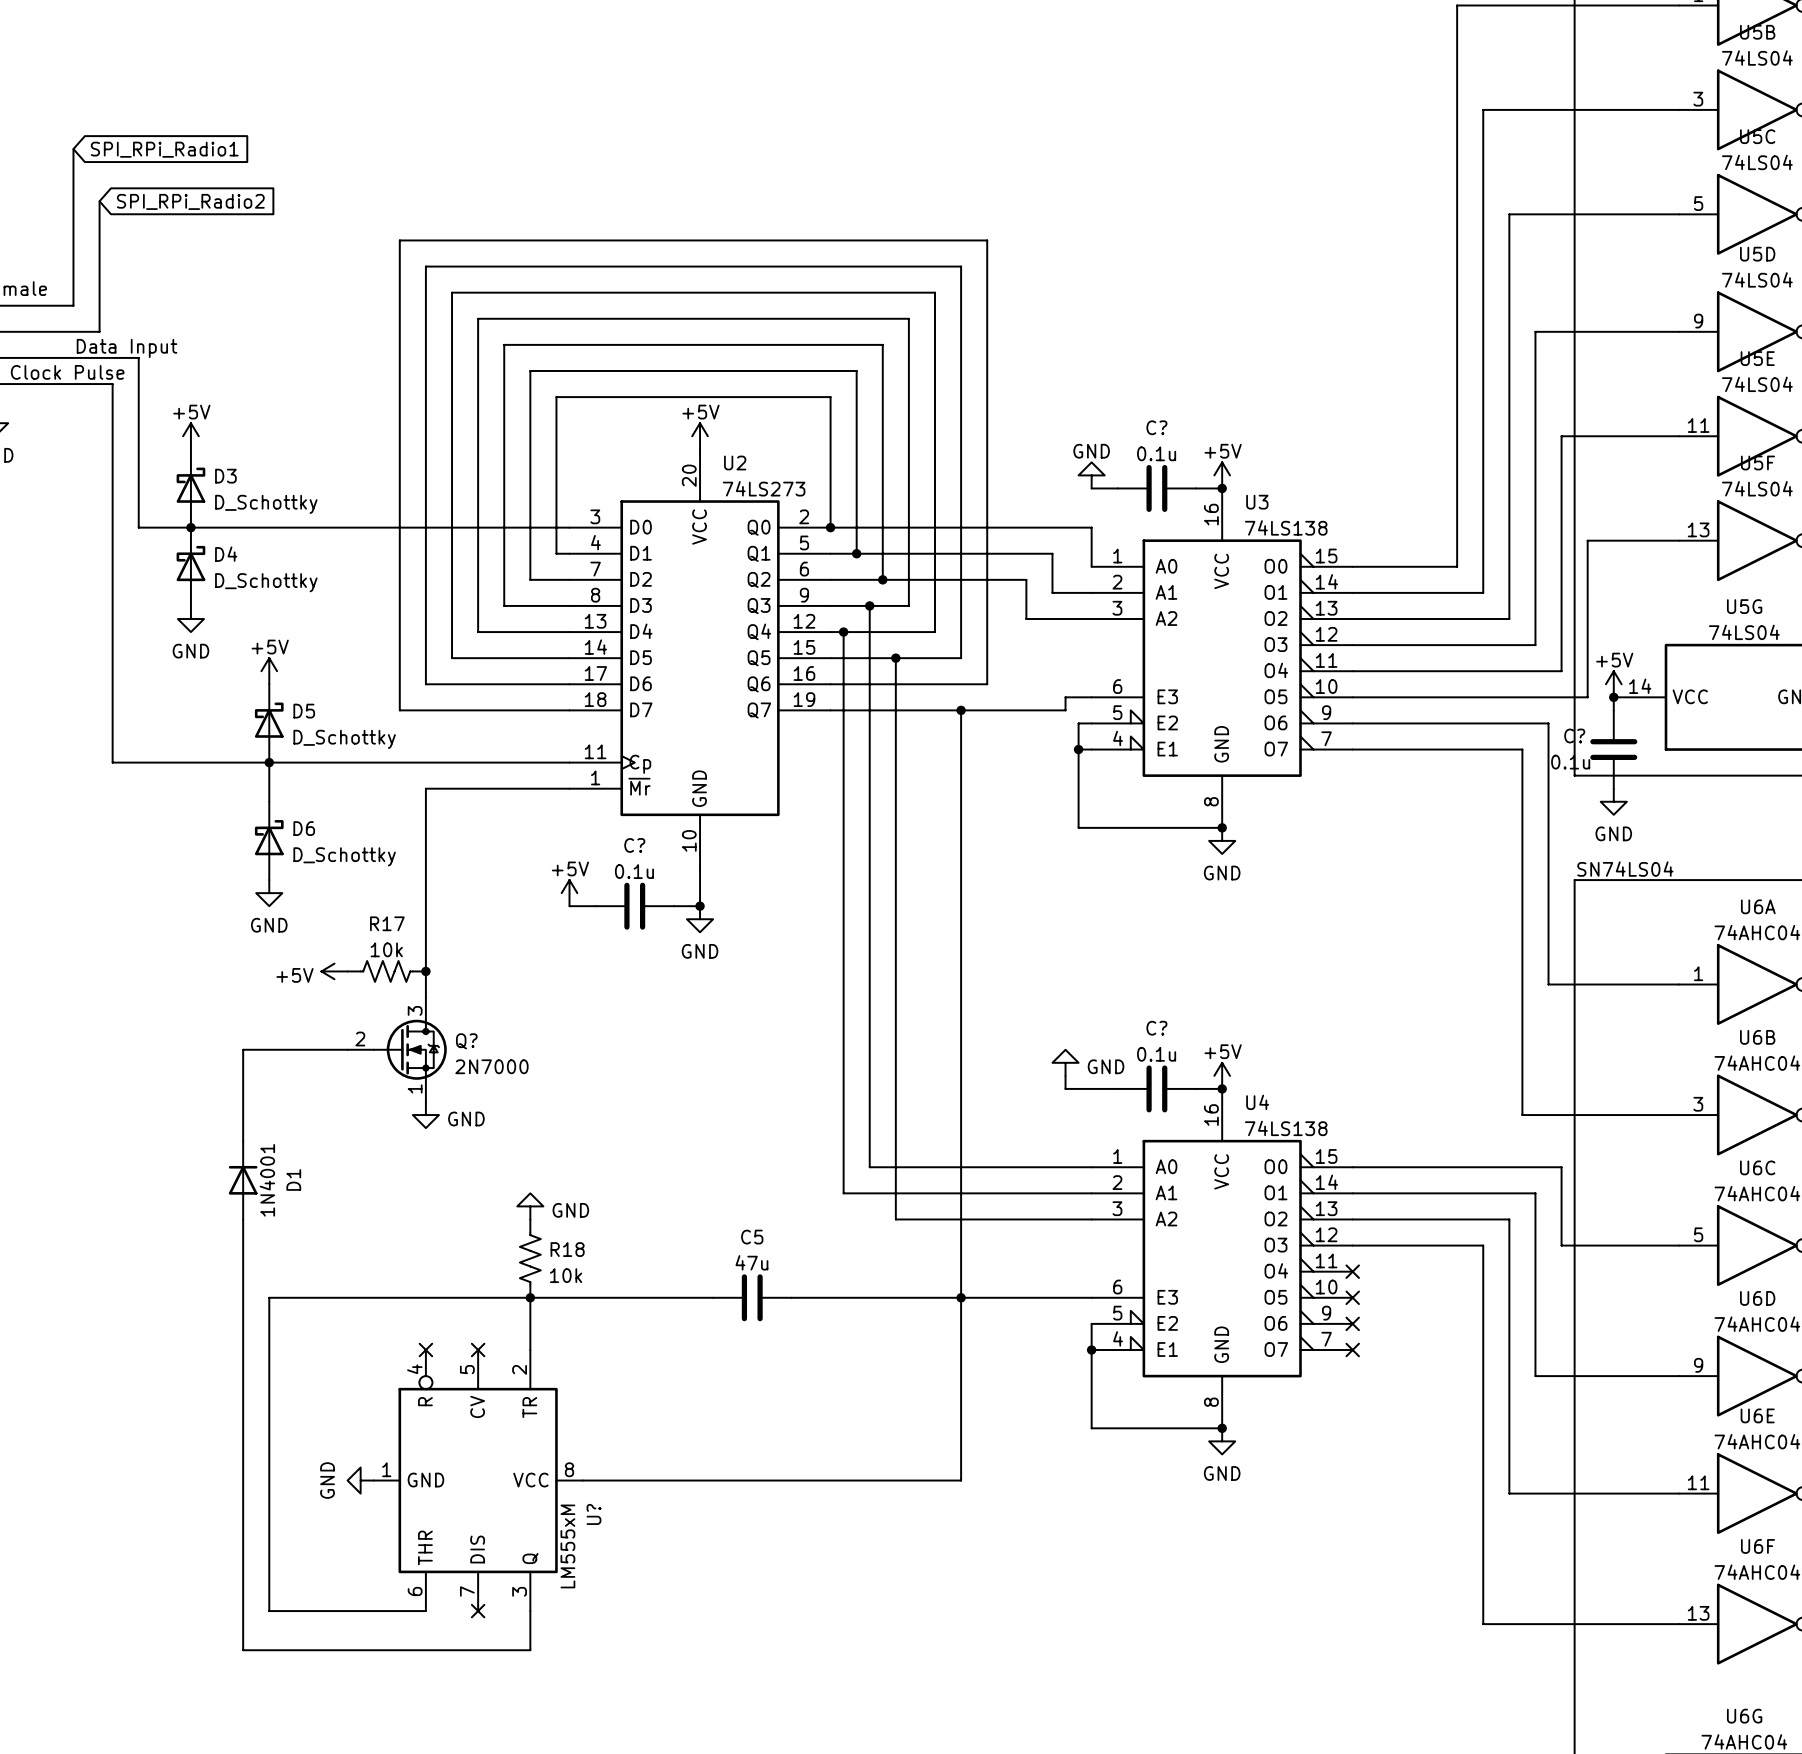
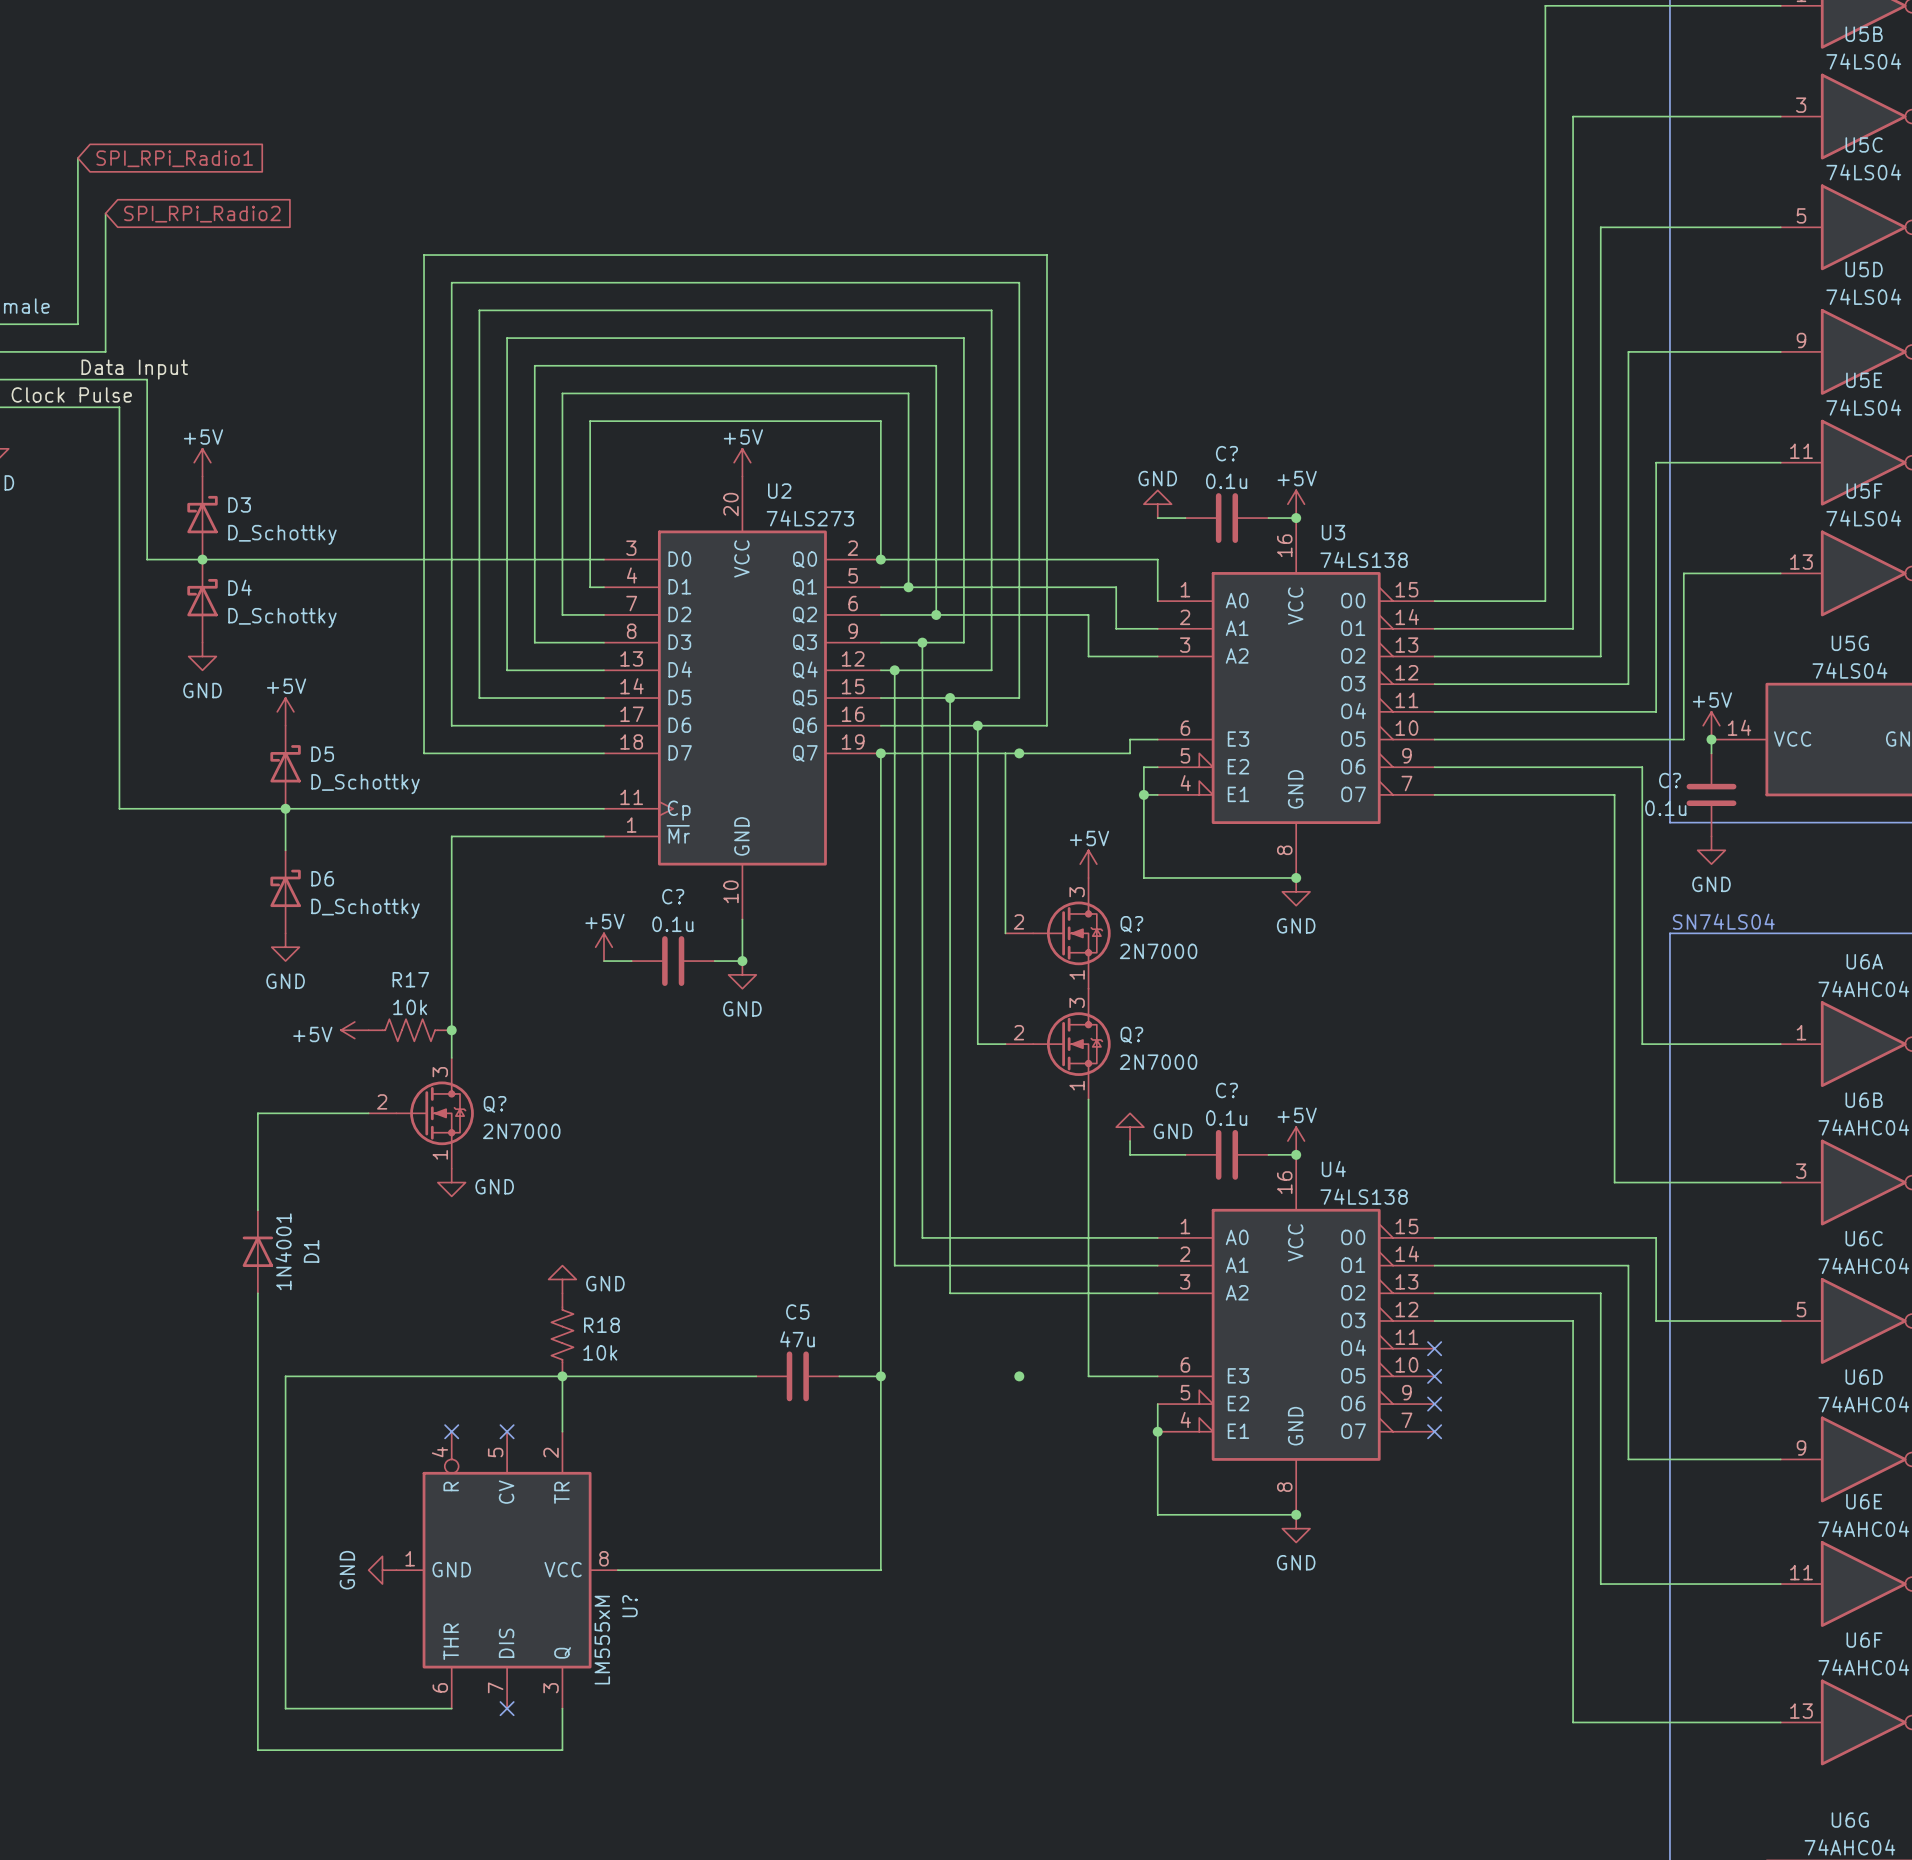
wire: none -> (977, 725) (977, 1044) (1005, 1044)
junction: none -> (977, 725)
junction: none -> (880, 753)
wire: none -> (1005, 753) (1005, 933)
wire: (961, 710) (961, 1480) (830, 1480) -> (880, 753) (880, 1570)
power symbol: none -> +5V (1088, 864)
Q?: none -> 2N7000 (1058, 933)
Q?: none -> 2N7000 (1058, 1044)
wire: (830, 1297) (1026, 1297) -> (1088, 1099) (1088, 1376)
junction: none -> (880, 1376)

